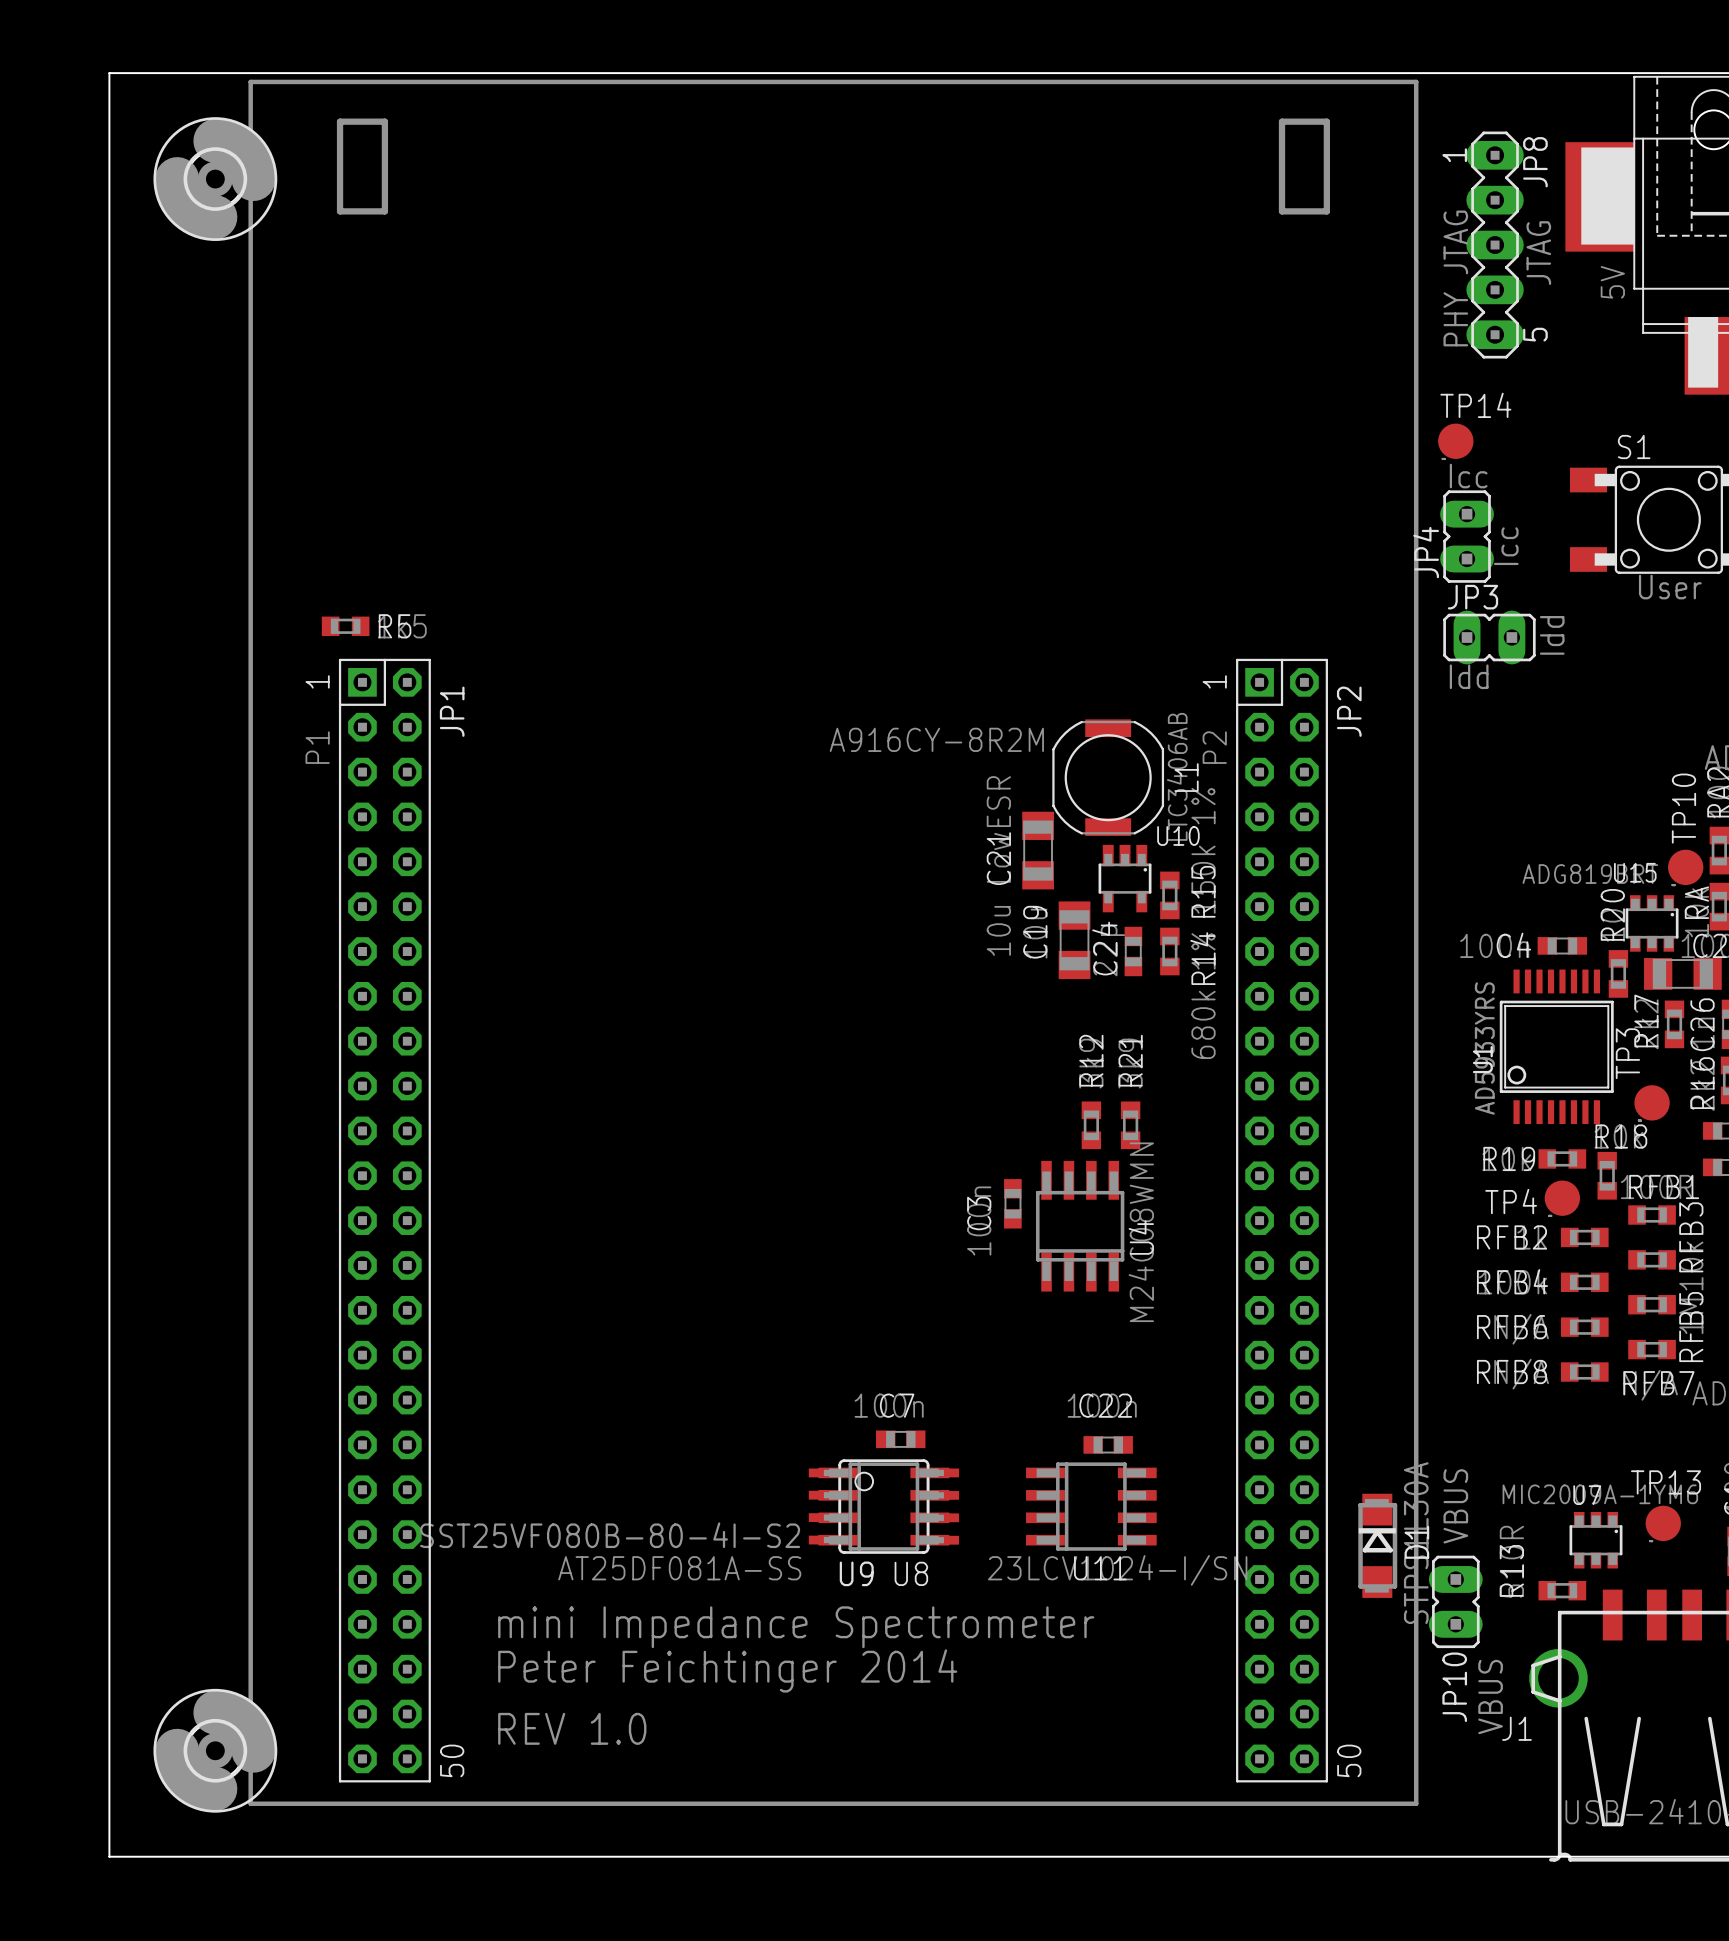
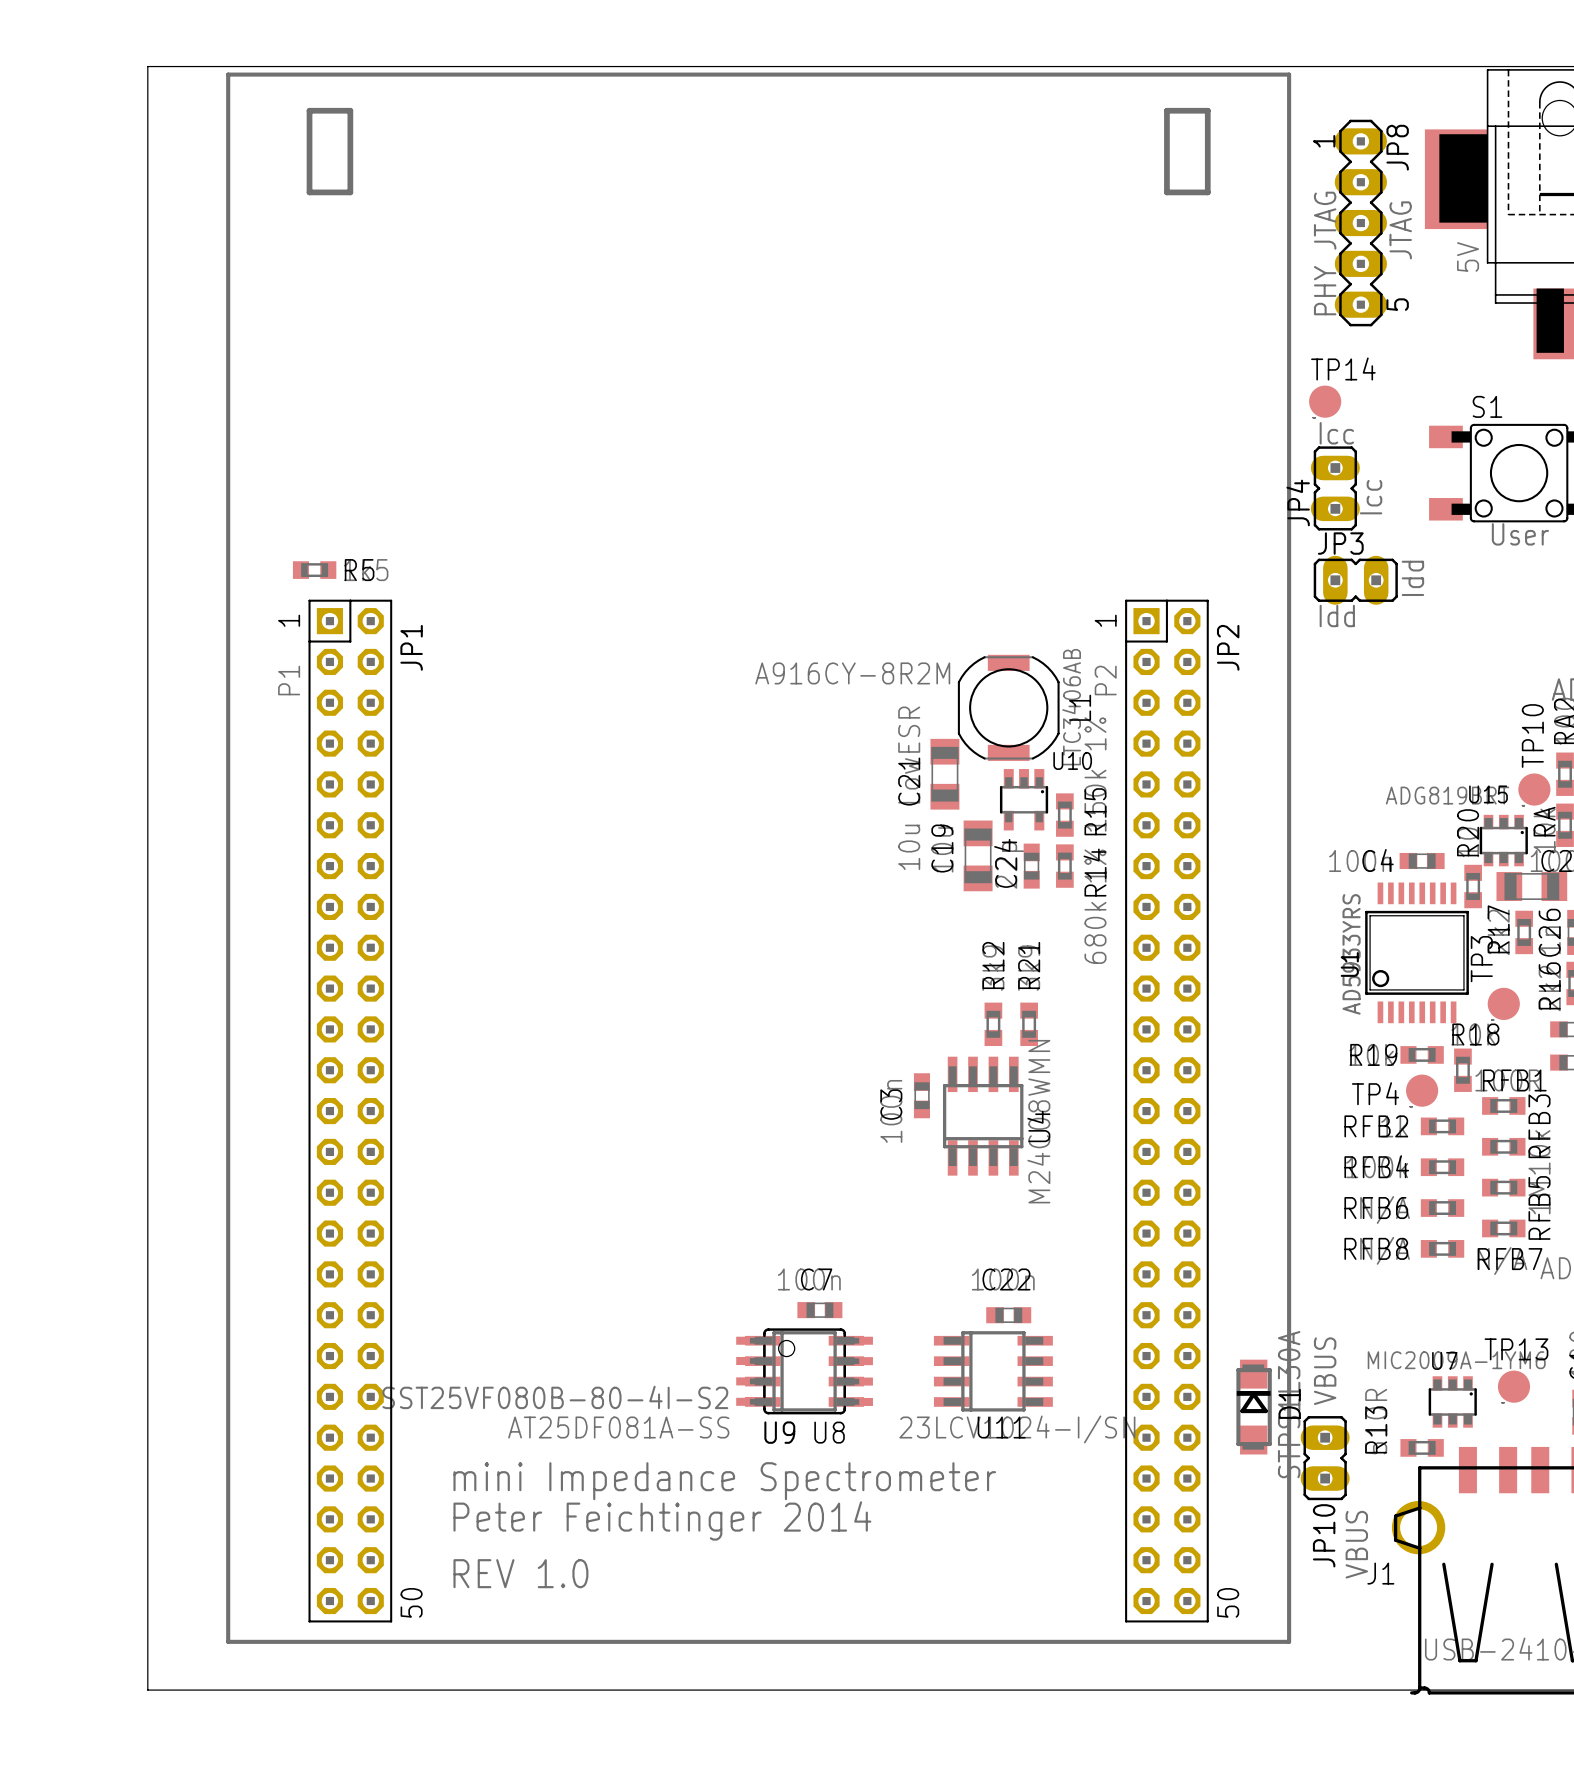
board edge: (162, 73) (109, 73) (109, 1856) (162, 1856) -> (147, 66) (147, 1690)
part: (215, 179) -> none
part: (215, 1750) -> none

